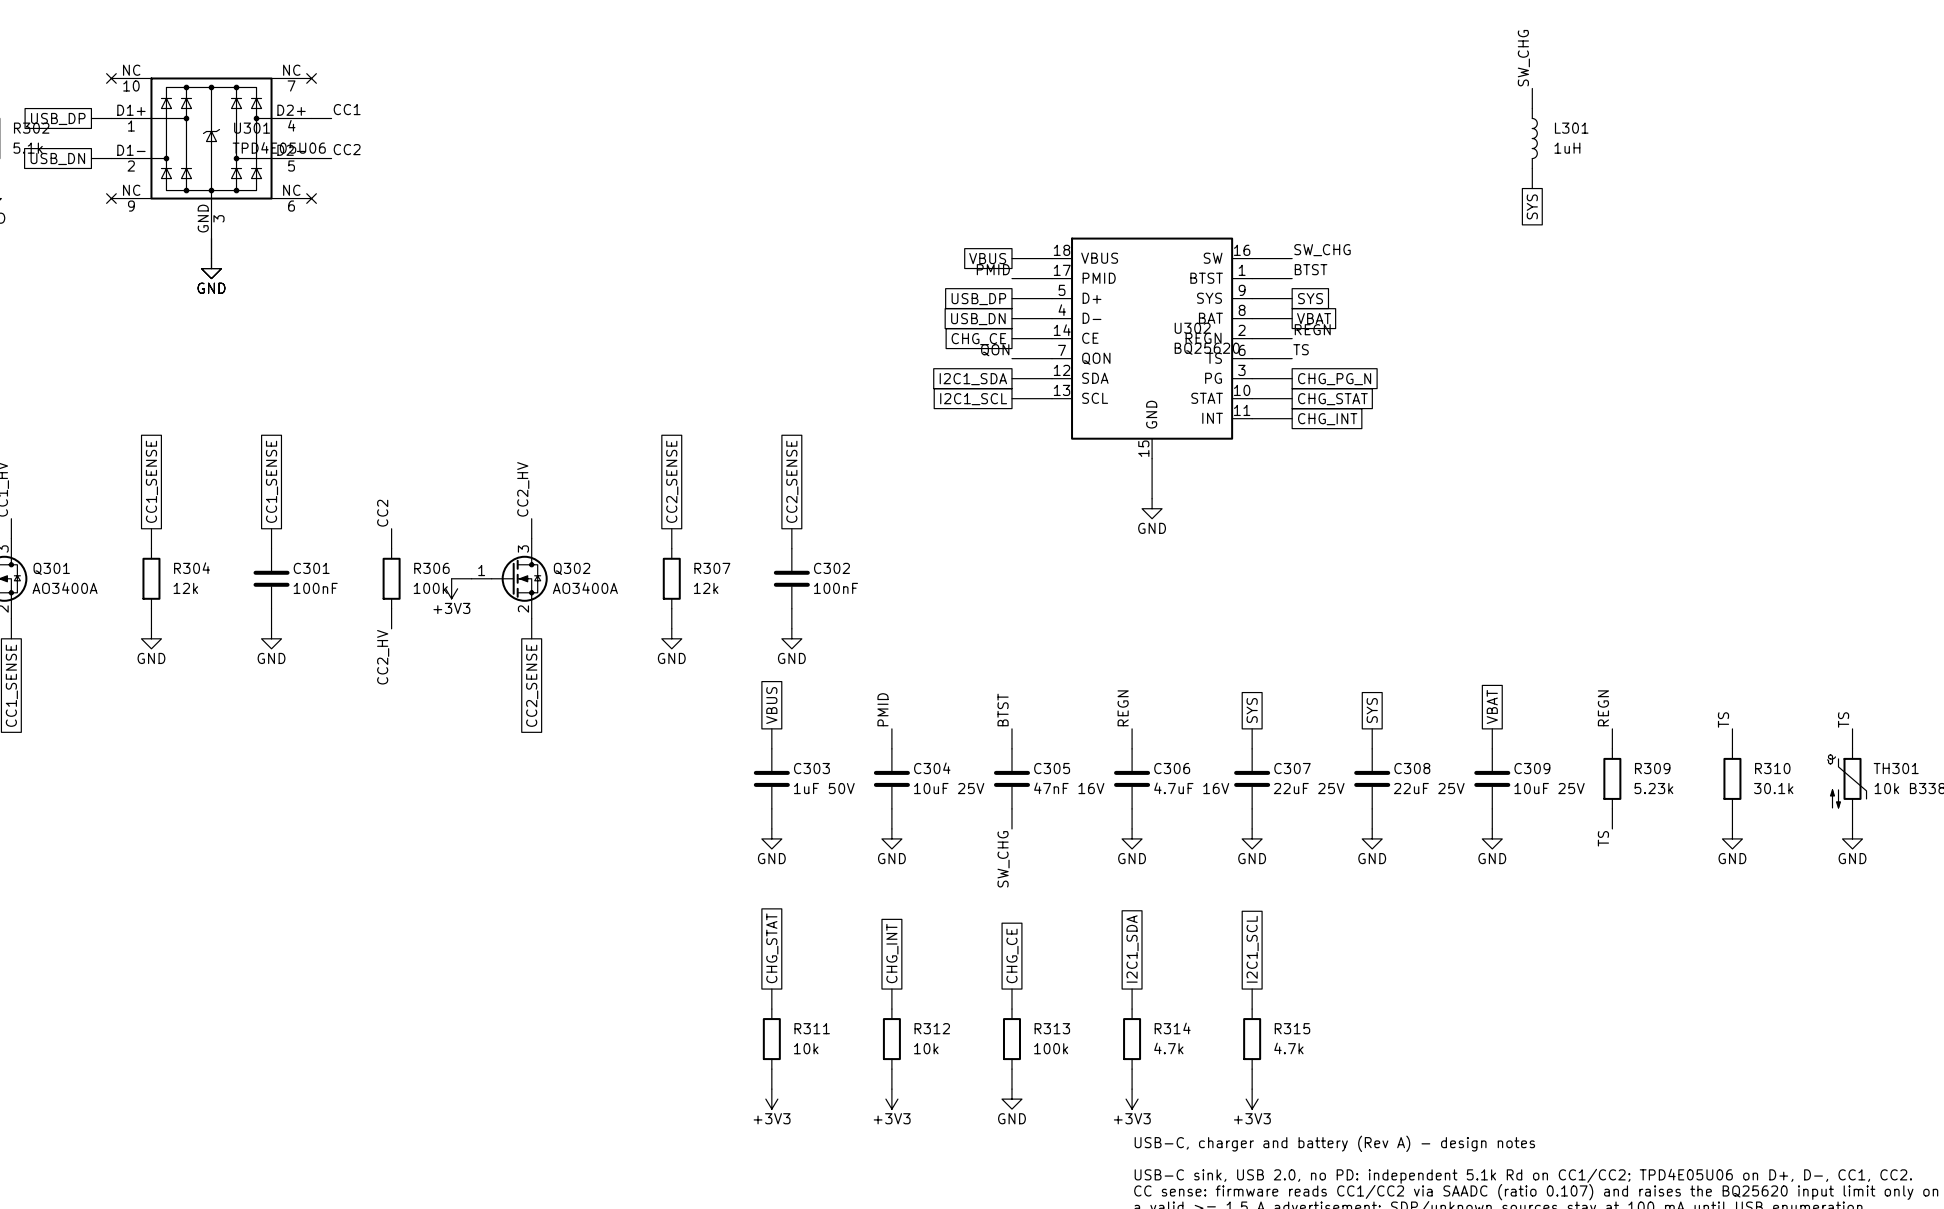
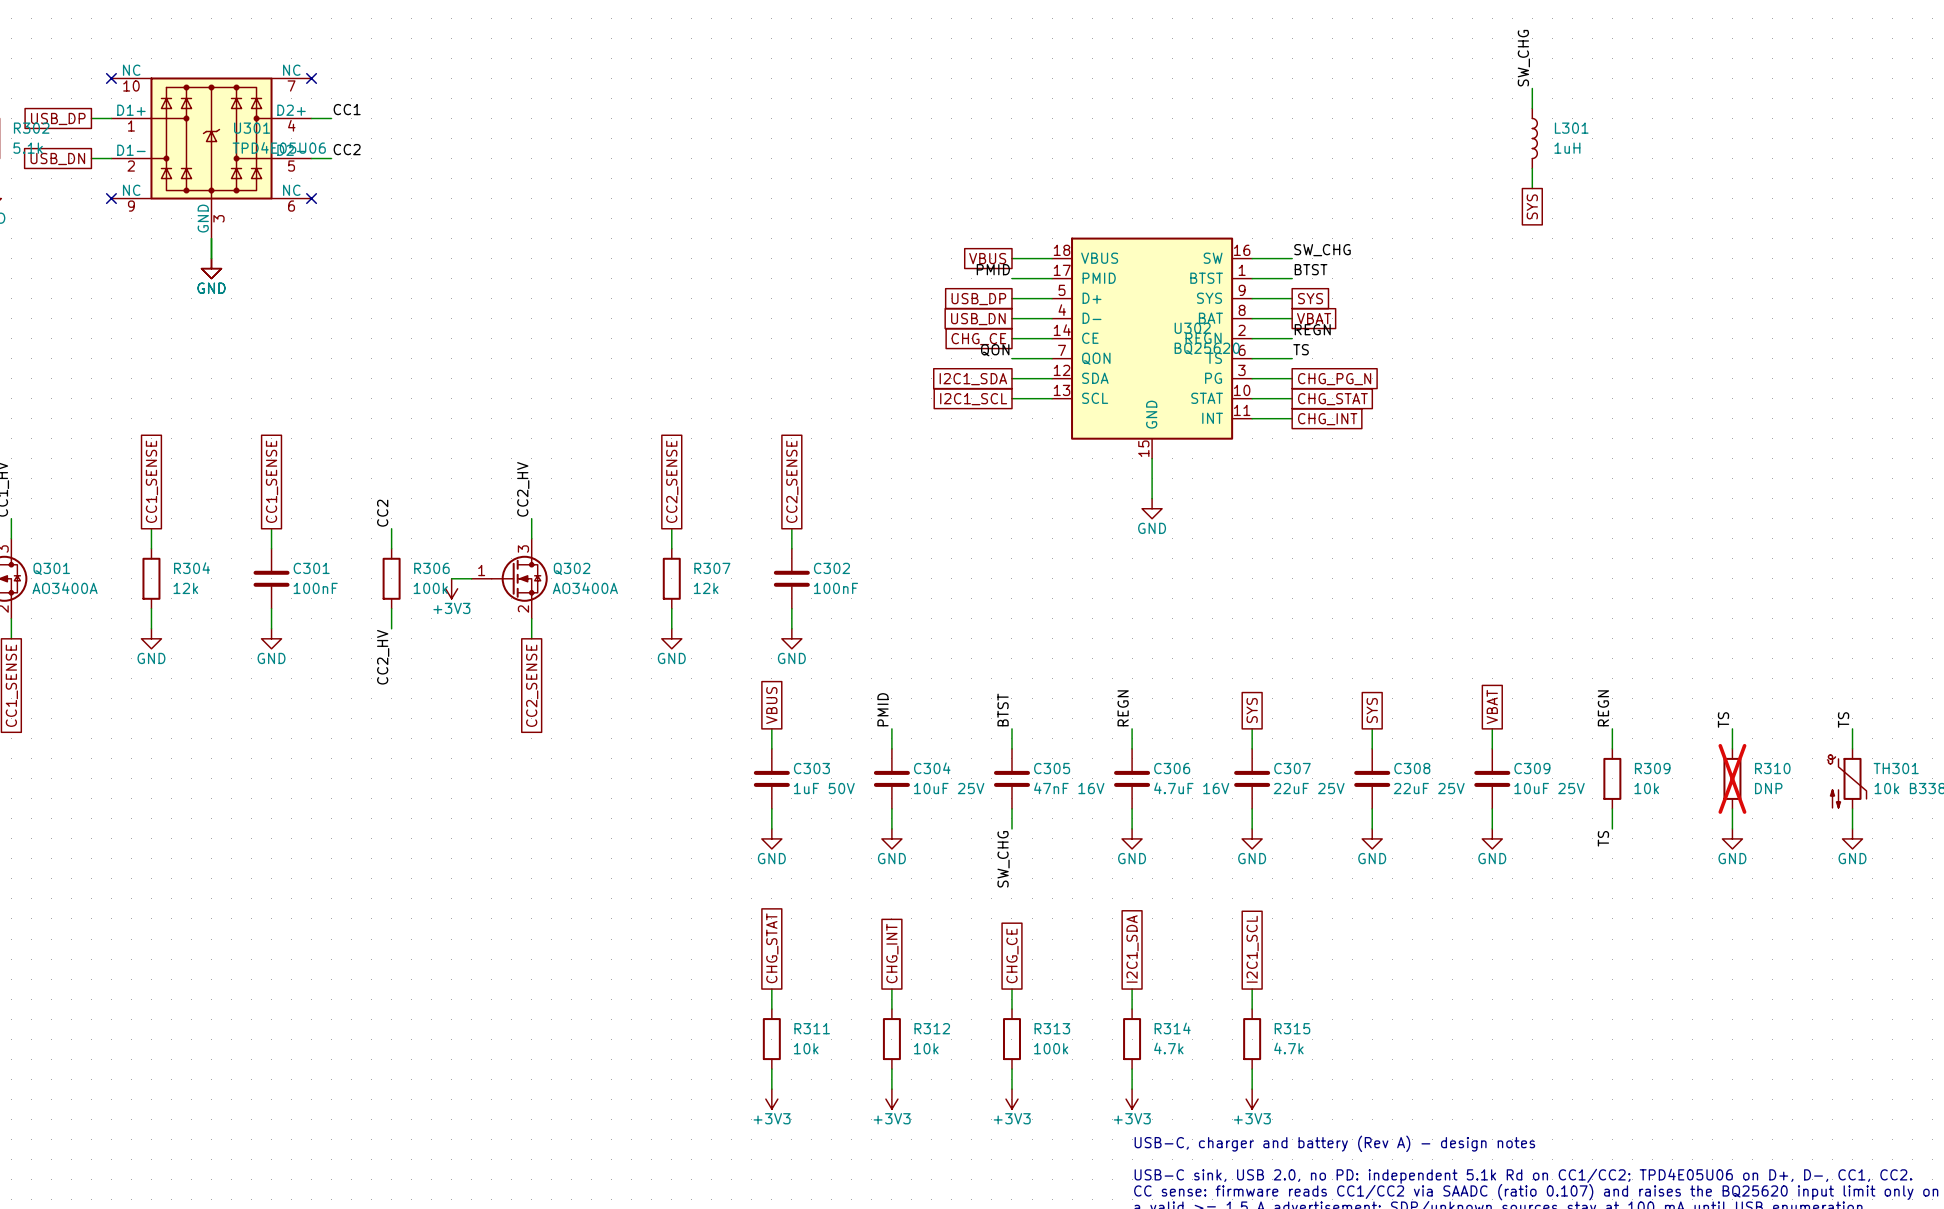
R310 do-not-place cross: none -> (1732, 778)
R309 value: 5.23k (1653, 788) -> 10k (1646, 788)
R310 value: 30.1k (1773, 788) -> DNP (1768, 788)
power symbol: GND (1011, 1099) -> +3V3 (1011, 1099)

